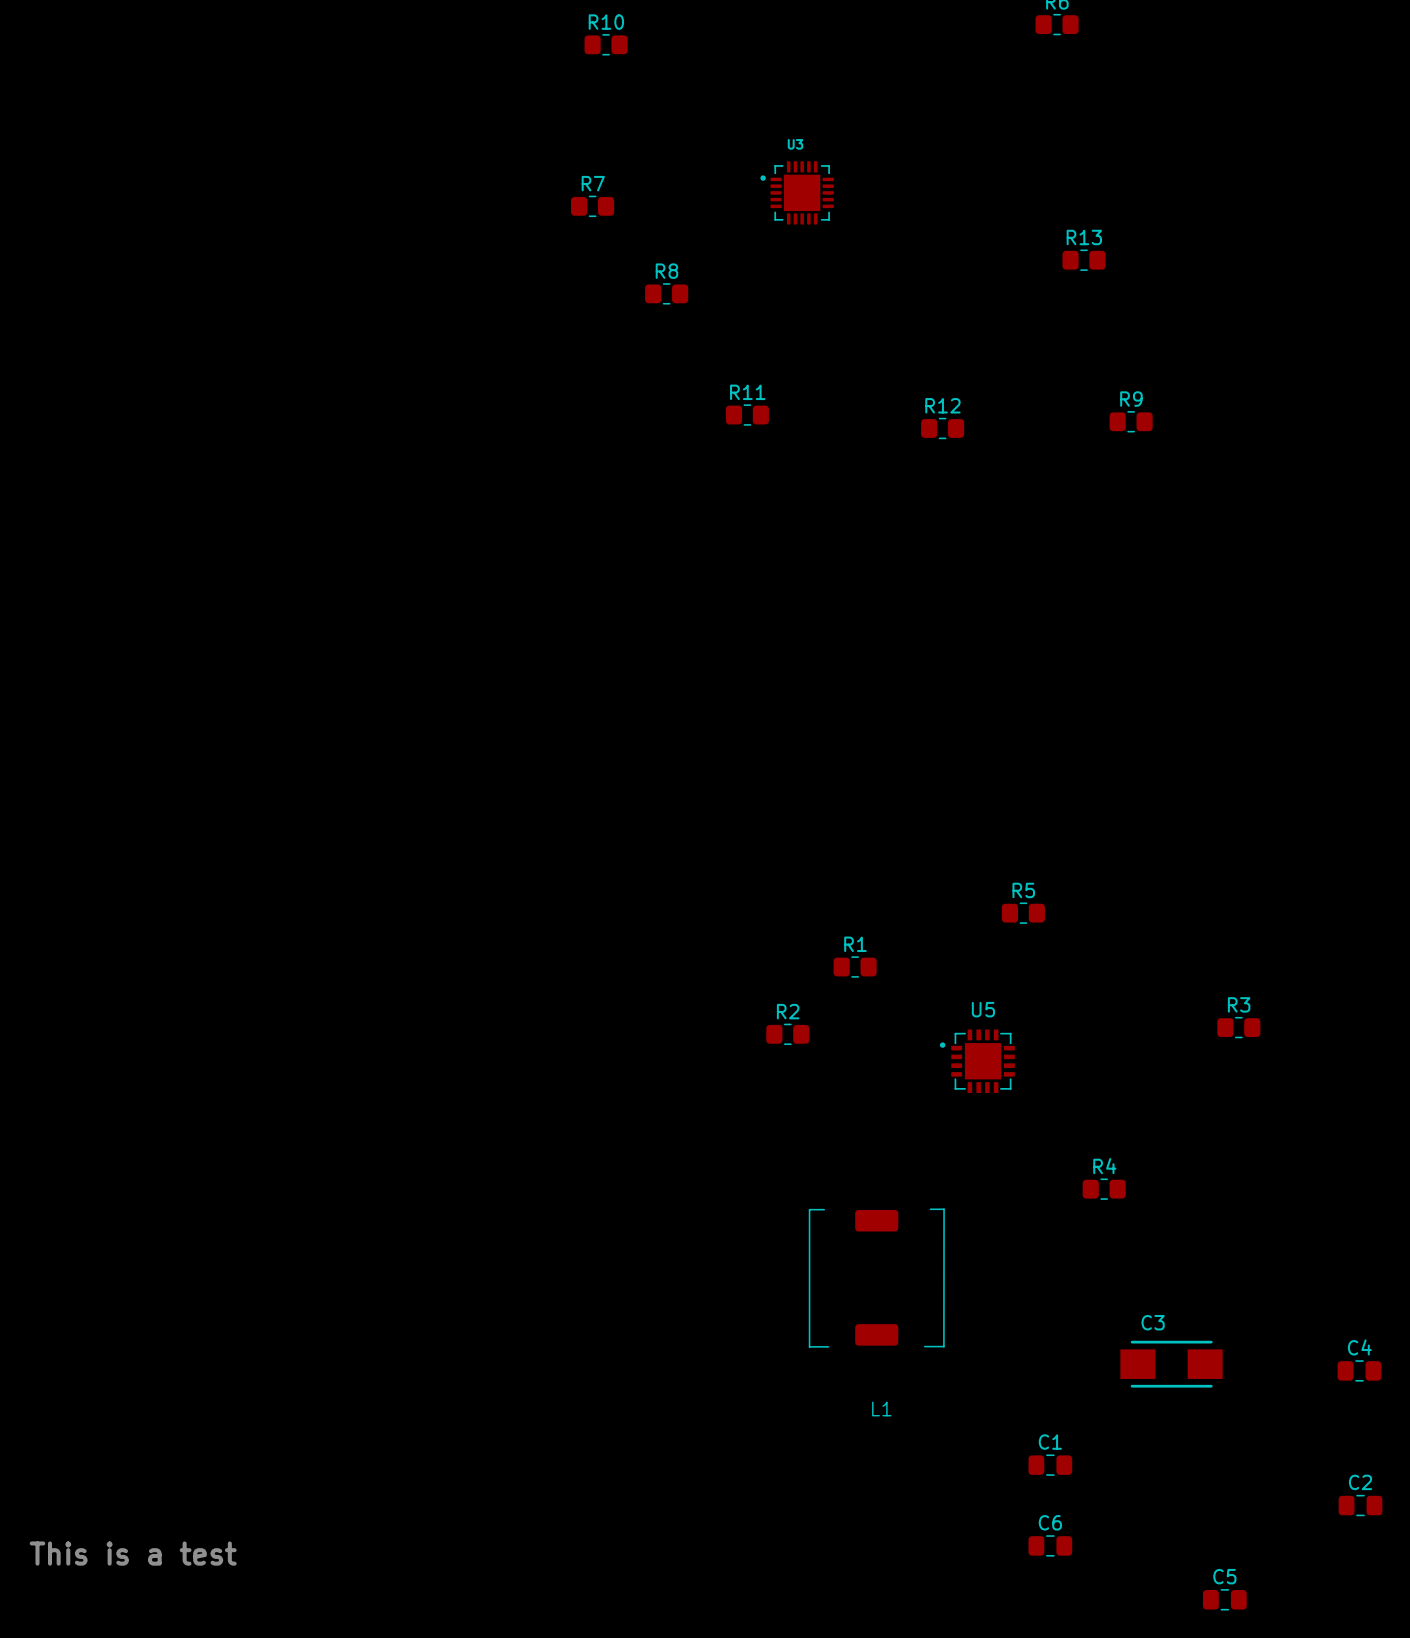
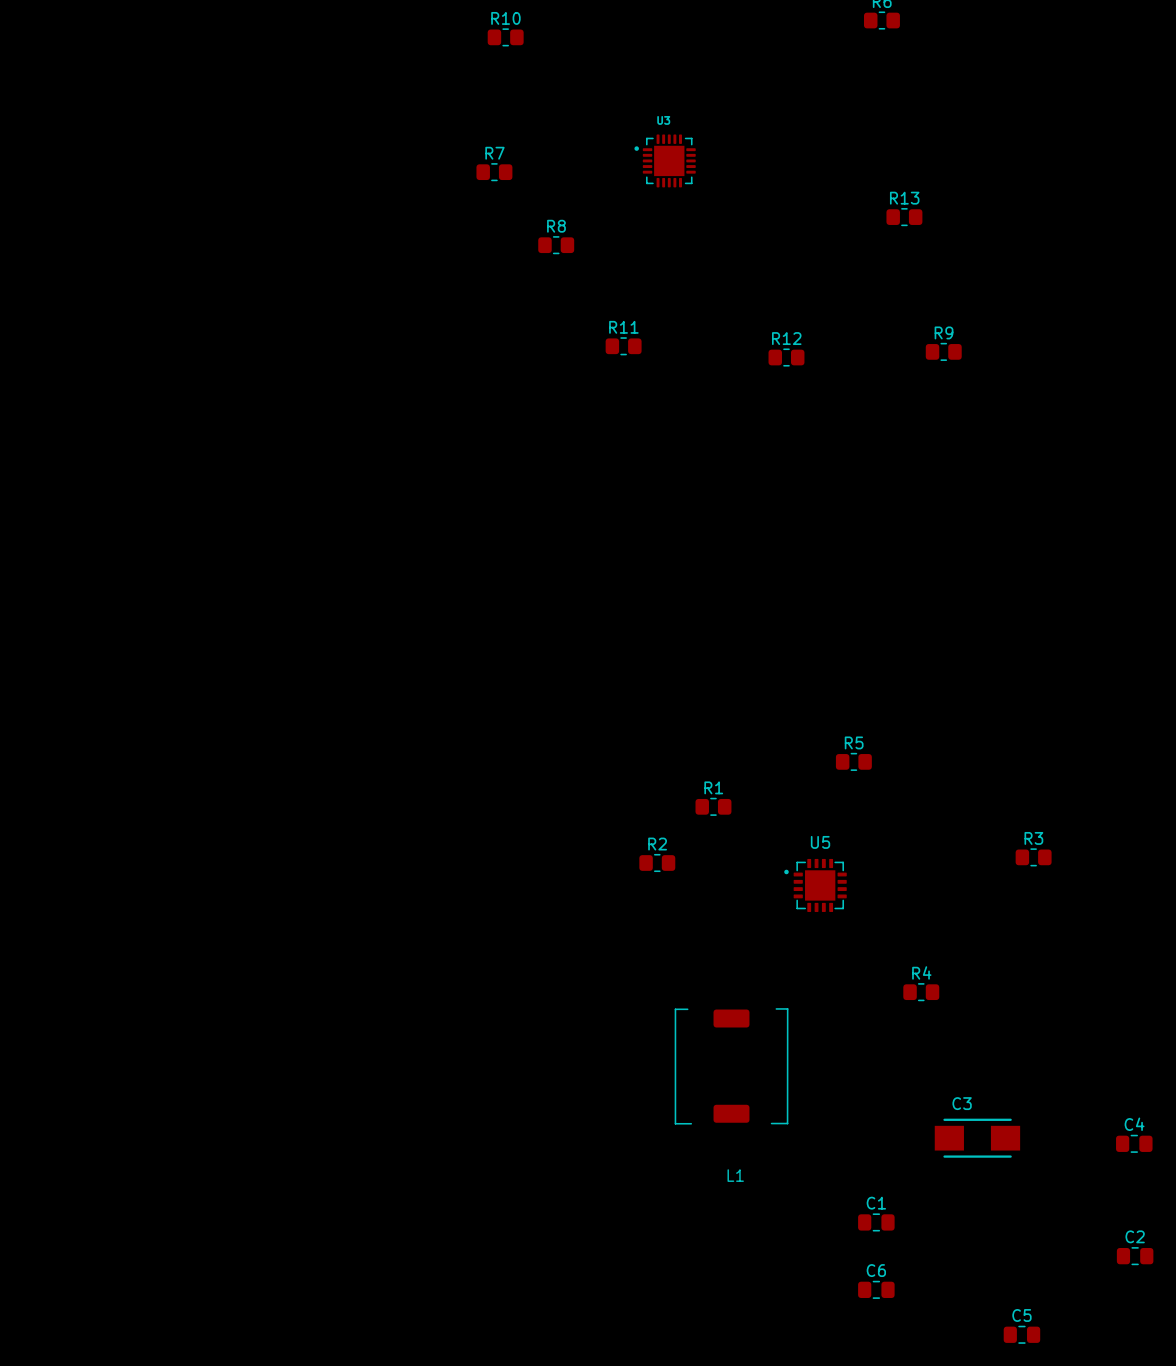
text: This is a test (133, 1553) -> none

